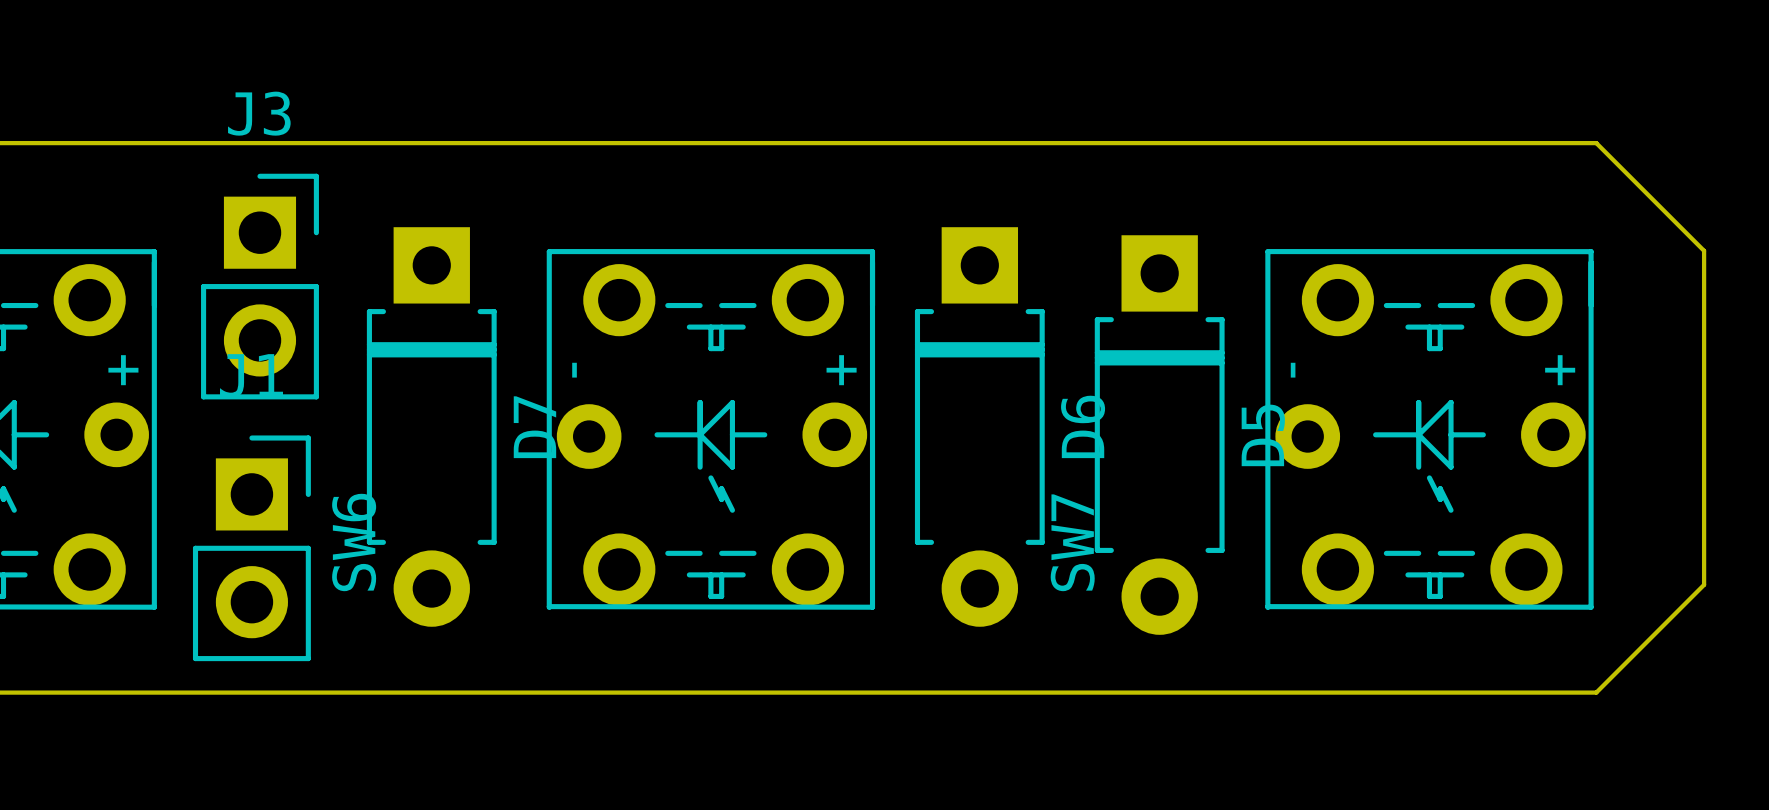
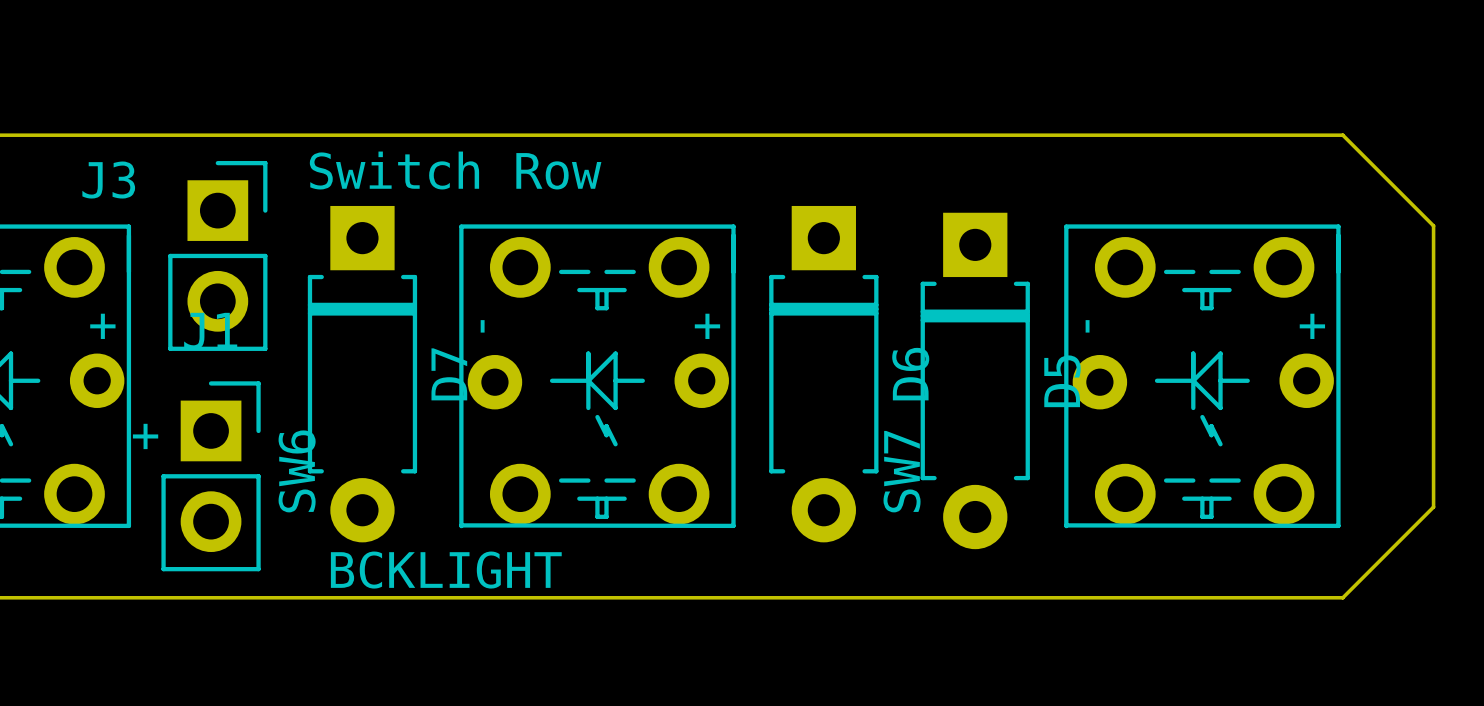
J3 name position: J3 (259, 113) -> J3 (108, 180)
text: none -> Switch Row (455, 170)
text: none -> + (145, 436)
text: none -> BCKLIGHT (446, 570)

